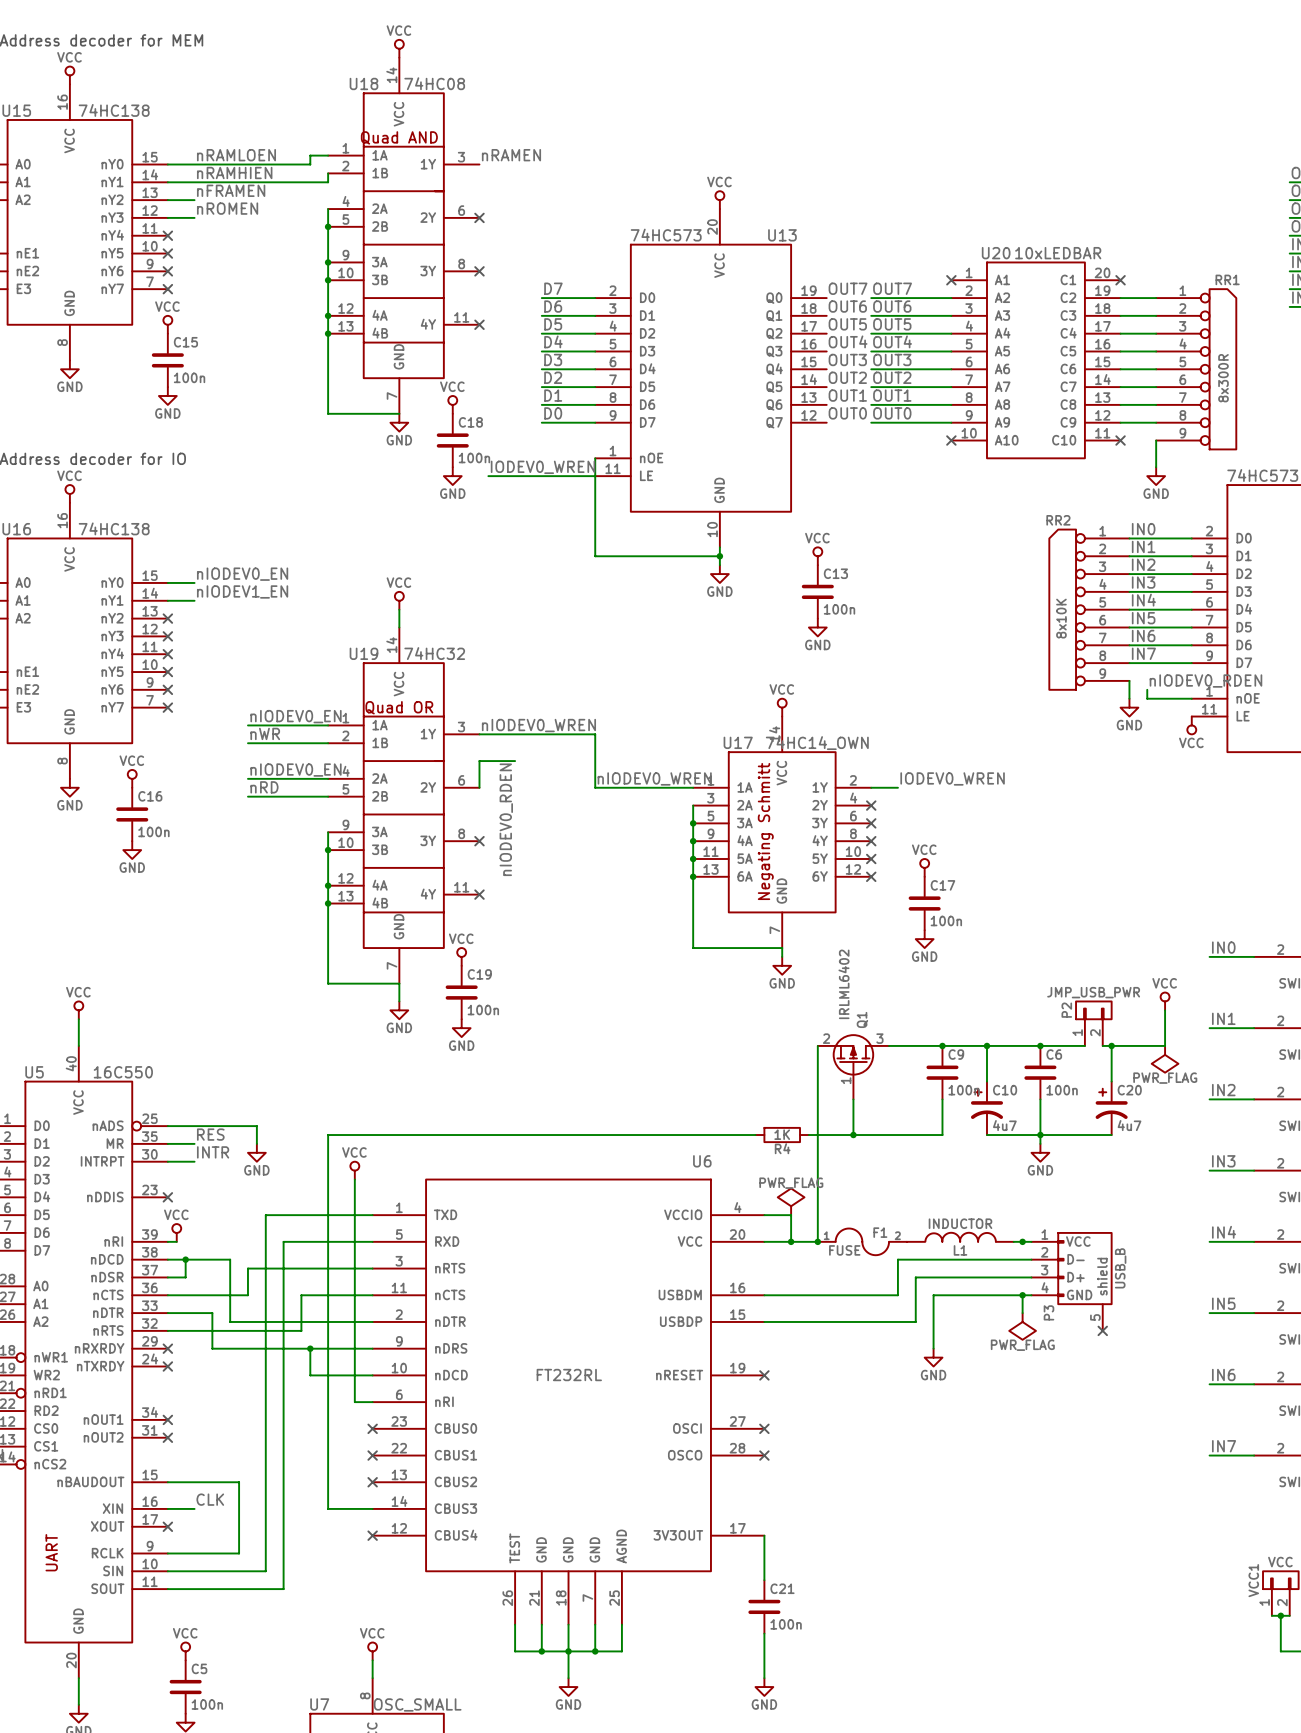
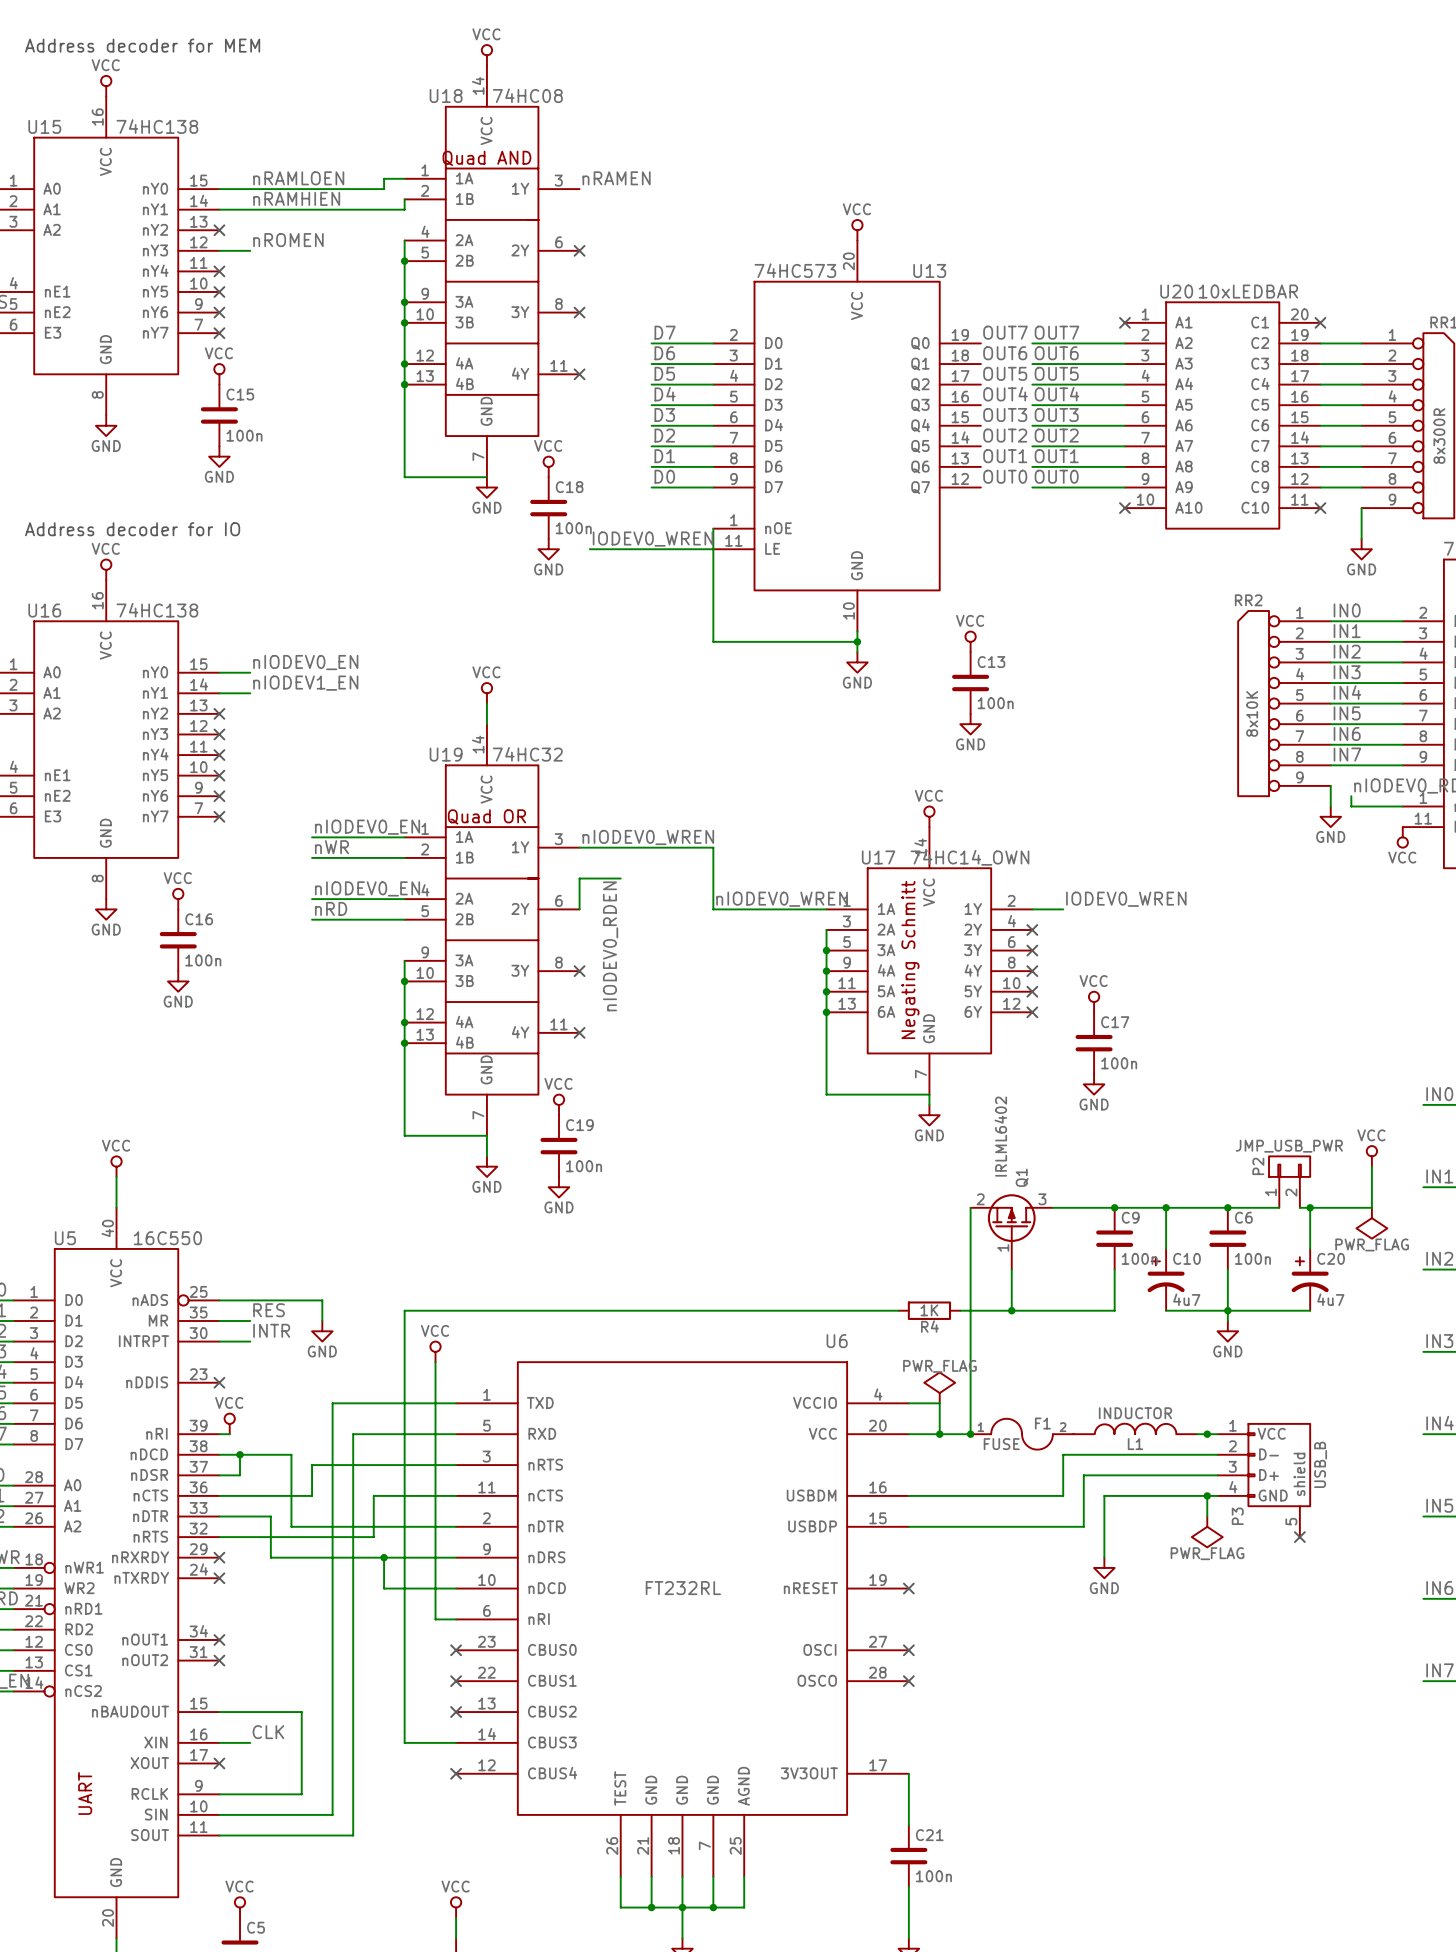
label: nFRAMEN (231, 190) -> none
wire: (167, 200) (194, 200) -> none
no-connect mark: none -> (219, 230)

